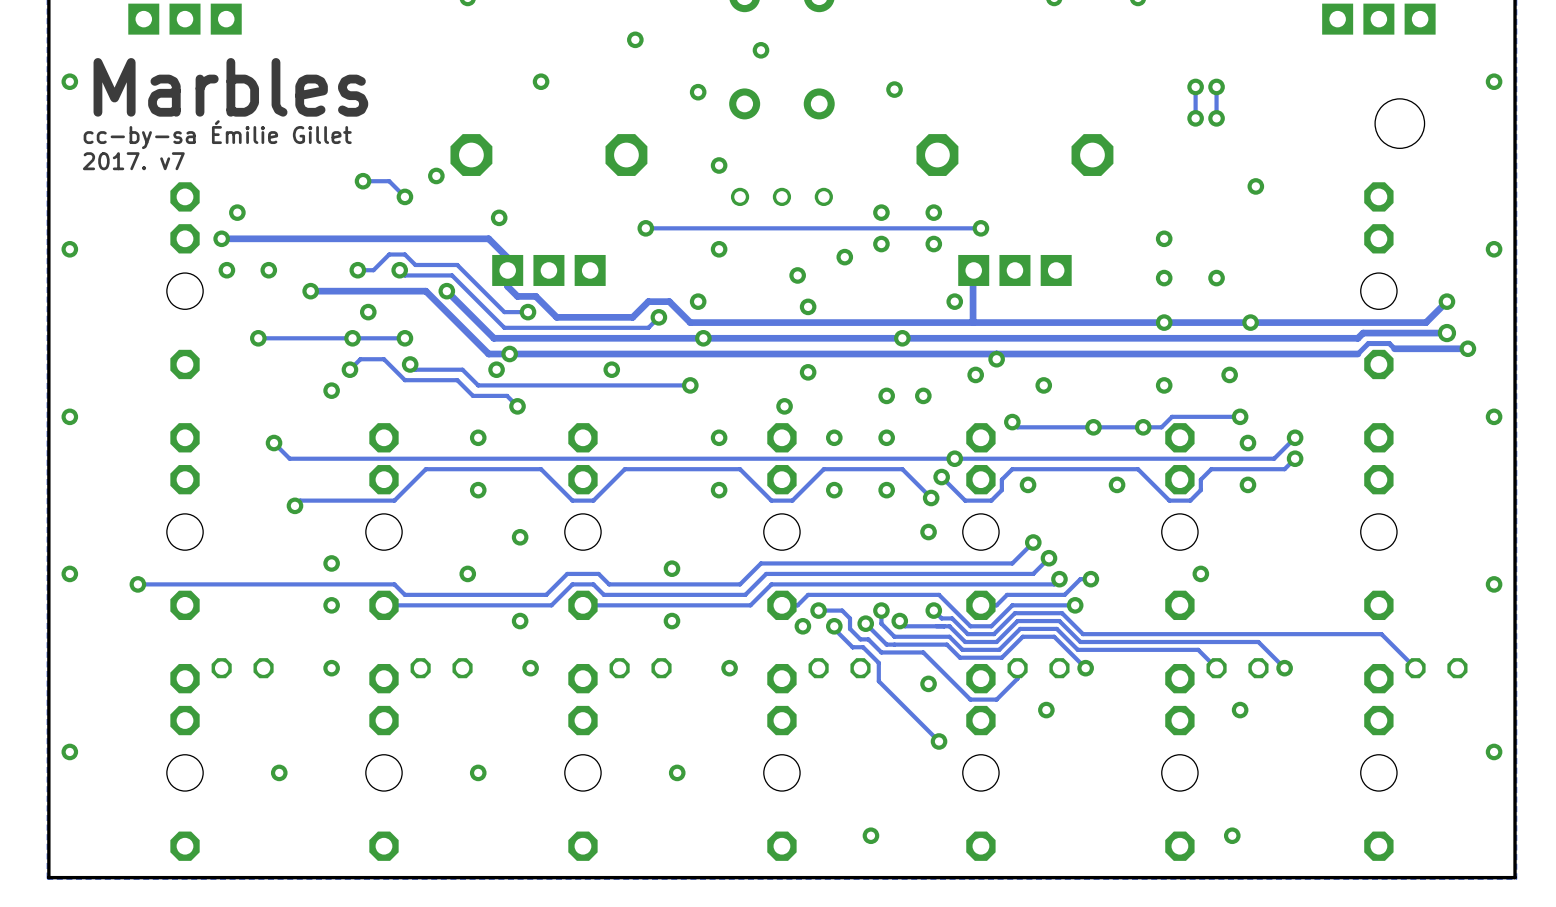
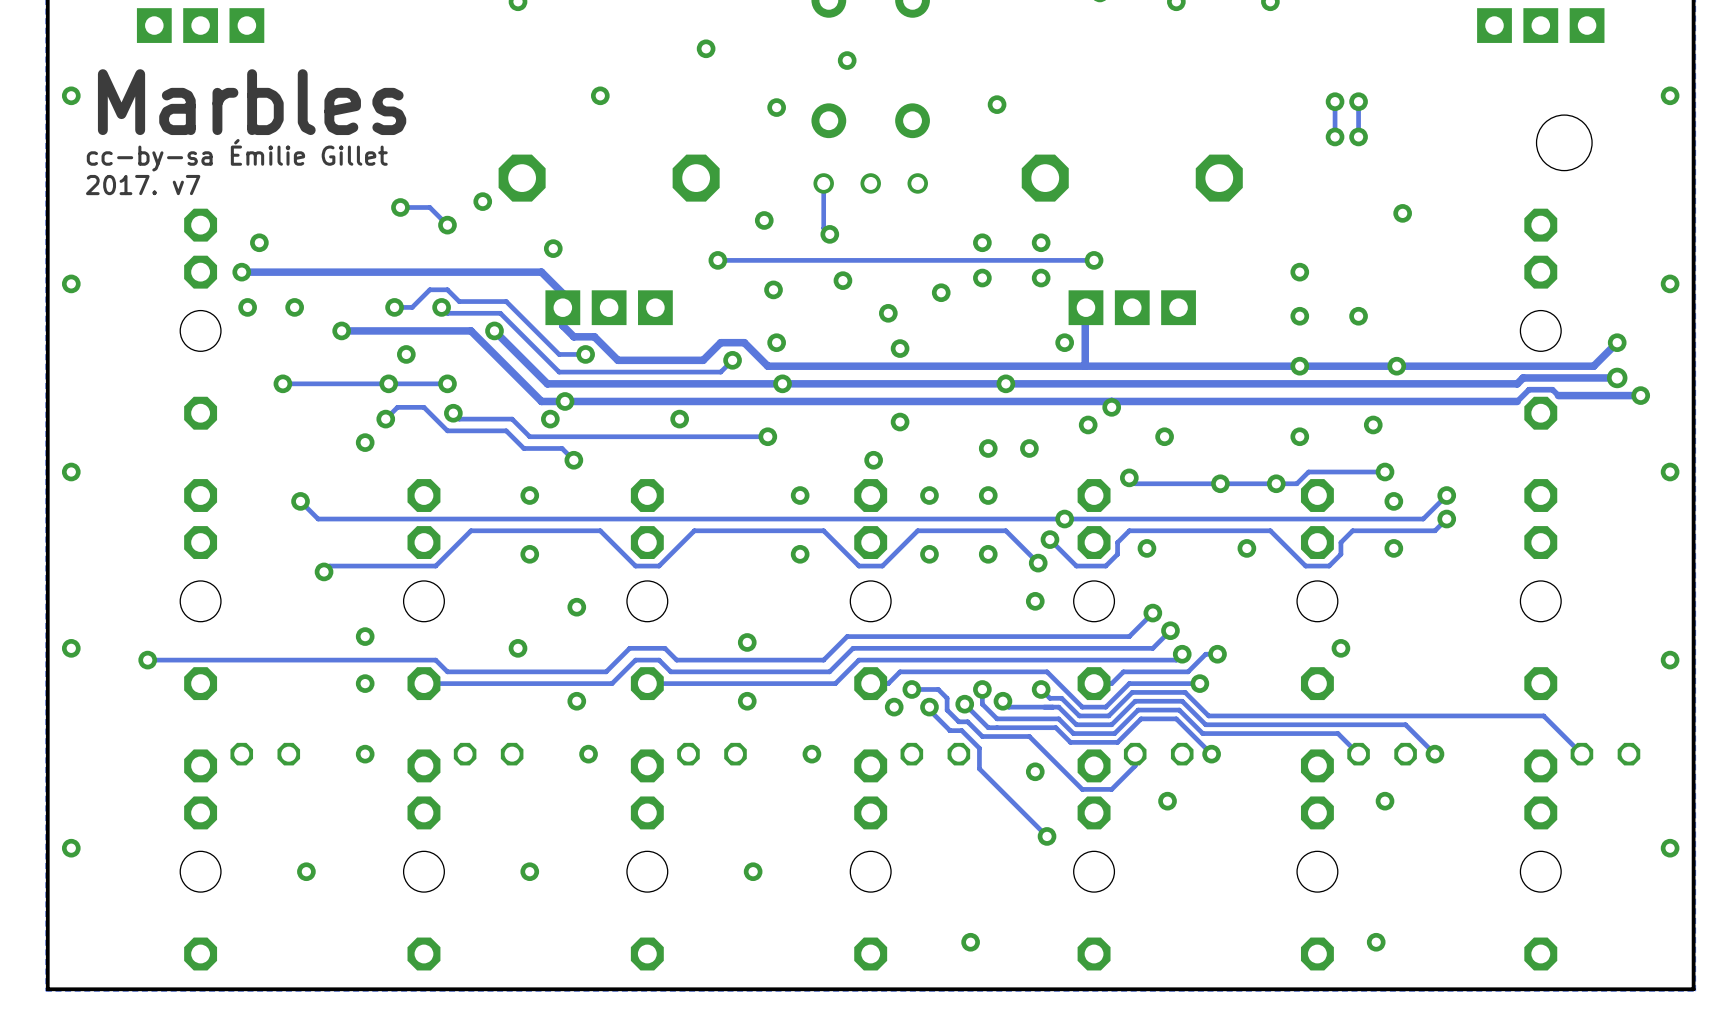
track: none -> (823, 183) (823, 228) (829, 234)
via: (719, 165) -> none
via: none -> (764, 220)
part position: (781, 196) -> (870, 183)
via: none -> (829, 234)
via: none -> (842, 280)
via: (719, 249) -> none
via: none -> (773, 289)

